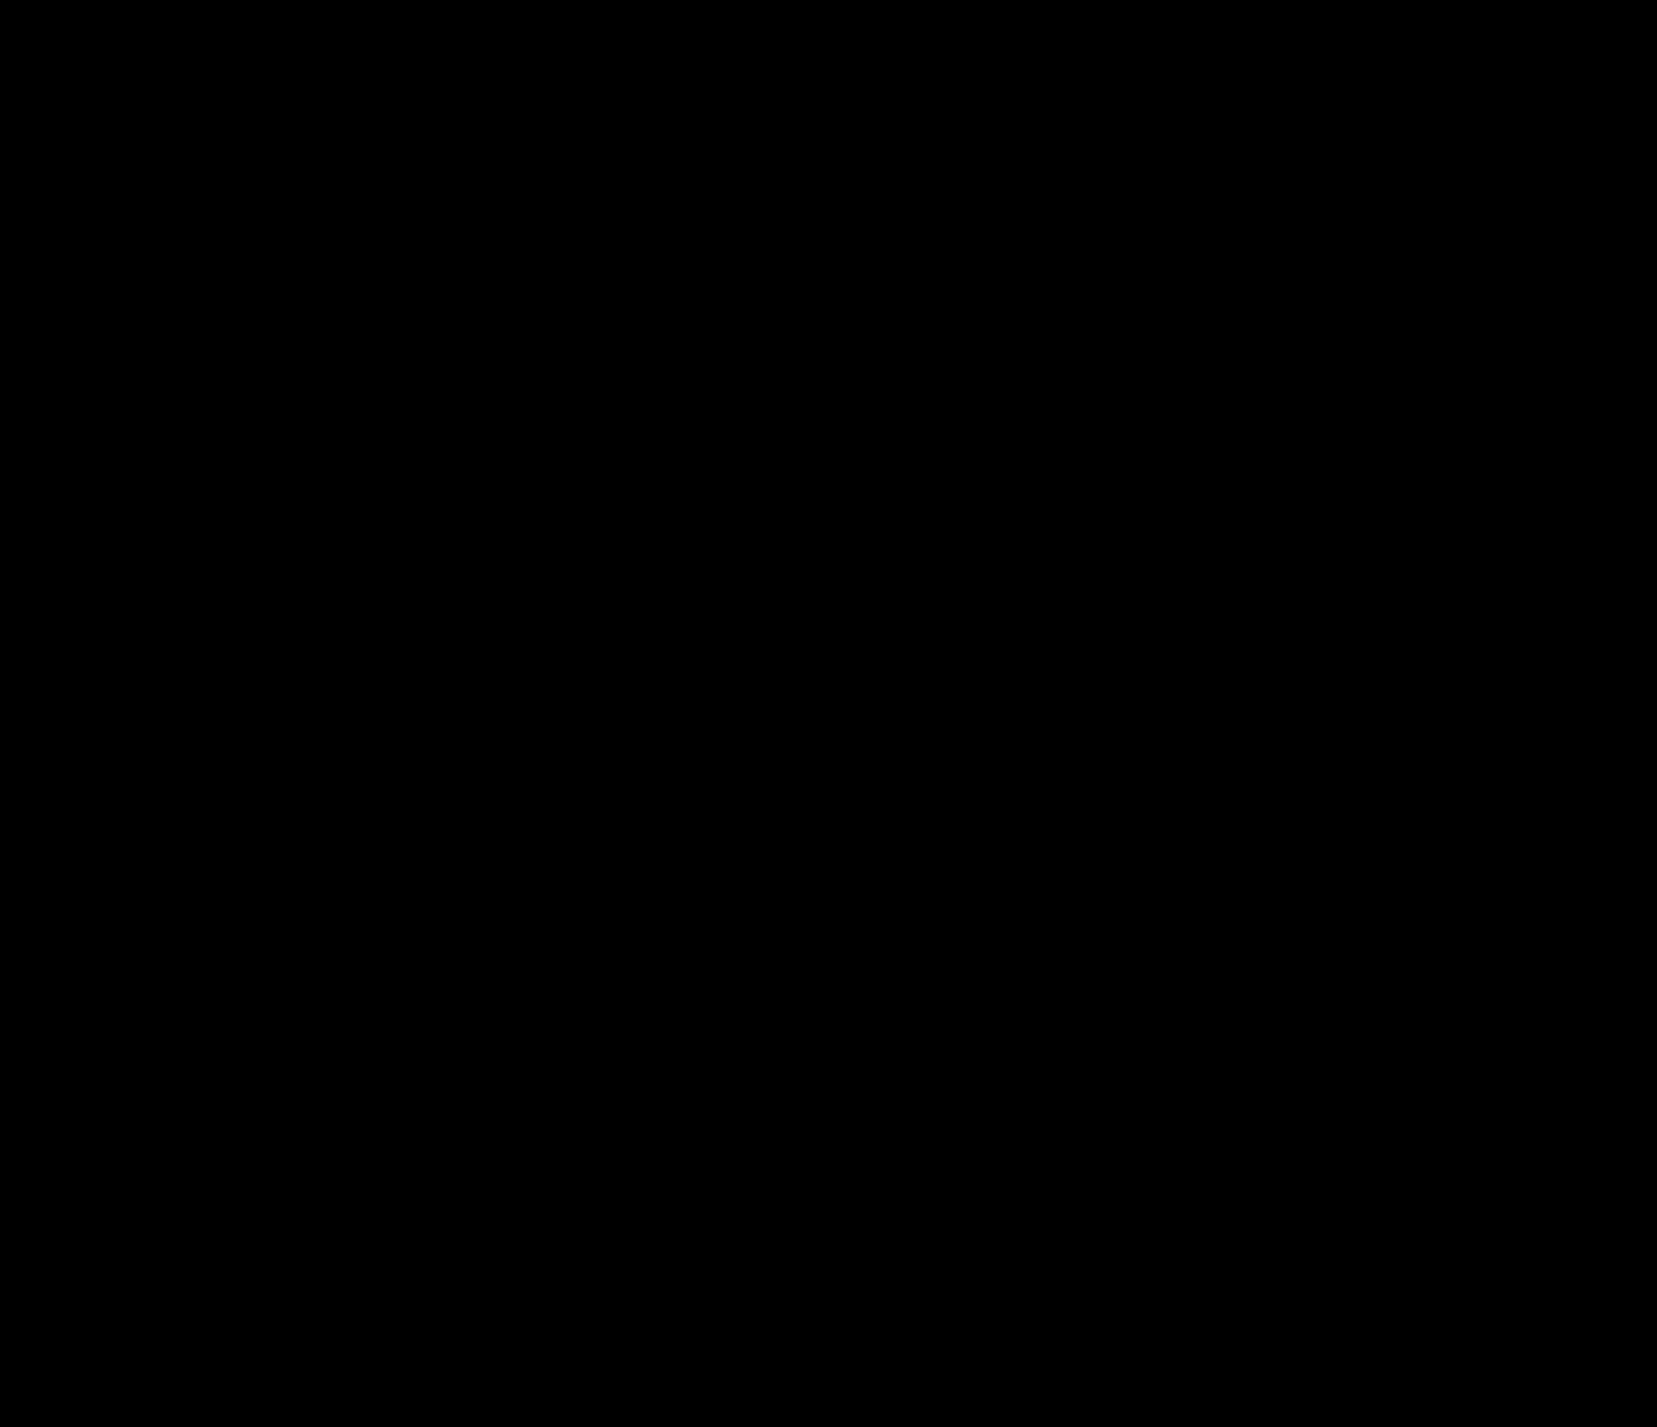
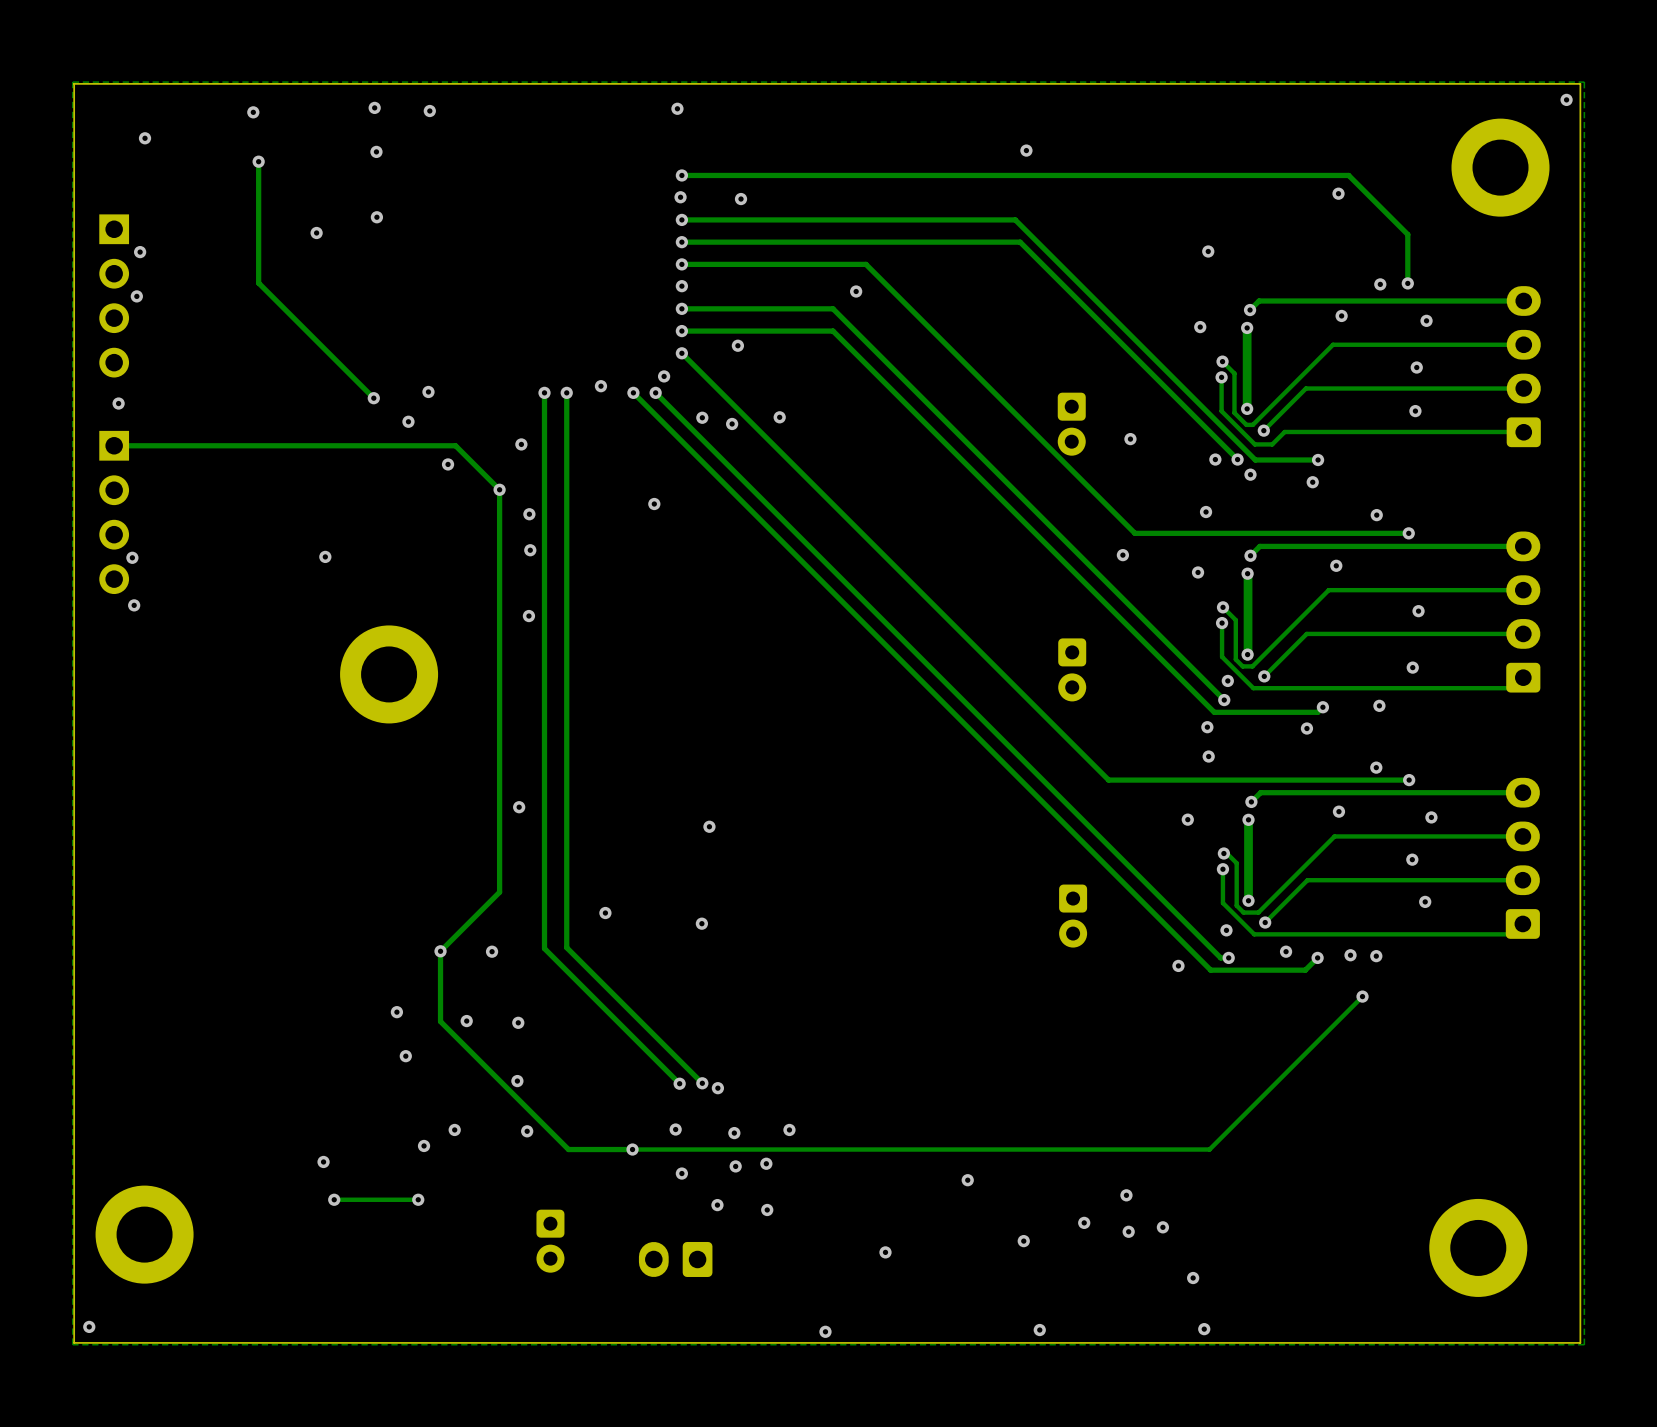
zone outline: none -> (1584, 82) (72, 82) (72, 1344) (1584, 1344) (1584, 82)
board edge: none -> (1580, 83) (74, 83) (74, 1342) (1580, 1342) (1580, 83)
via: none -> (1566, 99)
via: none -> (374, 107)
via: none -> (677, 108)
via: none -> (429, 111)
via: none -> (253, 112)
via: none -> (145, 138)
via: none -> (1026, 150)
via: none -> (376, 151)
track: none -> (258, 161) (258, 283) (373, 398)
via: none -> (258, 161)
part: none -> (1500, 167)
track: none -> (681, 175) (1348, 175) (1407, 234) (1407, 283)
via: none -> (681, 175)
via: none -> (1338, 193)
via: none -> (680, 197)
via: none -> (741, 199)
via: none -> (376, 217)
track: none -> (681, 219) (1015, 219) (1255, 459) (1318, 459)
via: none -> (681, 219)
via: none -> (316, 232)
track: none -> (681, 242) (1020, 242) (1237, 459)
via: none -> (681, 242)
via: none -> (1208, 251)
via: none -> (140, 252)
track: none -> (681, 264) (865, 264) (1134, 533) (1408, 533)
via: none -> (681, 264)
via: none -> (1407, 283)
via: none -> (1380, 284)
via: none -> (681, 286)
via: none -> (856, 291)
part: none -> (114, 295)
via: none -> (136, 296)
track: none -> (1523, 301) (1259, 301) (1250, 310)
track: none -> (681, 308) (833, 308) (1224, 700)
via: none -> (681, 308)
via: none -> (1250, 310)
via: none -> (1341, 315)
via: none -> (1426, 320)
via: none -> (1200, 327)
track: none -> (1247, 327) (1247, 408)
via: none -> (1247, 327)
track: none -> (681, 331) (833, 331) (1214, 712) (1317, 712) (1322, 707)
via: none -> (681, 331)
track: none -> (1523, 344) (1333, 344) (1252, 424) (1246, 424) (1234, 412) (1234, 373) (1222, 361)
via: none -> (737, 345)
track: none -> (681, 353) (1108, 780) (1409, 780)
via: none -> (681, 353)
via: none -> (1222, 361)
part: none -> (1523, 366)
via: none -> (1416, 367)
via: none -> (664, 376)
track: none -> (1221, 377) (1221, 411) (1254, 444) (1272, 444) (1284, 431) (1523, 432)
via: none -> (1221, 377)
via: none -> (600, 386)
track: none -> (1523, 388) (1305, 388) (1263, 430)
via: none -> (428, 391)
track: none -> (544, 392) (544, 948) (679, 1083)
via: none -> (544, 392)
track: none -> (566, 392) (566, 947) (702, 1083)
via: none -> (566, 392)
track: none -> (633, 392) (1210, 970) (1305, 970) (1317, 957)
via: none -> (633, 392)
track: none -> (655, 392) (1220, 957) (1228, 957)
via: none -> (655, 392)
via: none -> (373, 398)
via: none -> (118, 403)
via: none -> (1247, 408)
via: none -> (1415, 411)
via: none -> (702, 417)
via: none -> (779, 417)
via: none -> (408, 421)
via: none -> (732, 423)
part: none -> (1071, 424)
via: none -> (1263, 430)
via: none -> (1130, 439)
via: none -> (521, 444)
track: none -> (114, 445) (455, 445) (499, 489) (499, 892) (440, 951) (440, 1021) (568, 1149) (1209, 1149) (1362, 996)
via: none -> (1215, 459)
via: none -> (1237, 459)
via: none -> (1318, 459)
via: none -> (448, 464)
via: none -> (1250, 474)
via: none -> (1312, 482)
via: none -> (499, 489)
via: none -> (654, 504)
part: none -> (114, 512)
via: none -> (1206, 512)
via: none -> (529, 514)
via: none -> (1376, 515)
via: none -> (1408, 533)
track: none -> (1523, 546) (1259, 546) (1250, 555)
via: none -> (530, 550)
via: none -> (1122, 555)
via: none -> (1250, 555)
via: none -> (325, 556)
via: none -> (132, 557)
via: none -> (1336, 565)
via: none -> (1198, 572)
via: none -> (1247, 573)
track: none -> (1248, 573) (1248, 654)
track: none -> (1523, 590) (1328, 590) (1252, 666) (1242, 666) (1235, 659) (1235, 620) (1223, 607)
via: none -> (134, 605)
via: none -> (1223, 607)
via: none -> (1418, 611)
part: none -> (1523, 612)
via: none -> (528, 616)
track: none -> (1222, 623) (1222, 656) (1253, 688) (1512, 688) (1523, 677)
via: none -> (1222, 623)
track: none -> (1523, 633) (1306, 633) (1264, 676)
via: none -> (1247, 654)
via: none -> (1412, 667)
part: none -> (1072, 669)
part: none -> (389, 674)
via: none -> (1264, 676)
via: none -> (1227, 680)
via: none -> (1224, 700)
via: none -> (1379, 705)
via: none -> (1322, 707)
via: none -> (1207, 727)
via: none -> (1306, 728)
via: none -> (1208, 756)
via: none -> (1376, 767)
via: none -> (1409, 780)
track: none -> (1522, 792) (1260, 792) (1251, 801)
via: none -> (1251, 801)
via: none -> (519, 807)
via: none -> (1338, 811)
via: none -> (1431, 817)
via: none -> (1187, 819)
track: none -> (1248, 819) (1248, 900)
via: none -> (1248, 819)
via: none -> (709, 826)
track: none -> (1522, 836) (1334, 836) (1258, 912) (1243, 912) (1236, 905) (1236, 863) (1226, 853) (1223, 853)
via: none -> (1223, 853)
part: none -> (1522, 858)
via: none -> (1412, 859)
track: none -> (1222, 869) (1222, 903) (1254, 934) (1512, 934) (1522, 923)
via: none -> (1222, 869)
track: none -> (1522, 880) (1307, 880) (1265, 922)
via: none -> (1248, 900)
via: none -> (1425, 901)
via: none -> (605, 913)
part: none -> (1073, 916)
via: none -> (1265, 922)
via: none -> (701, 923)
via: none -> (1226, 930)
via: none -> (440, 951)
via: none -> (492, 951)
via: none -> (1286, 951)
via: none -> (1350, 955)
via: none -> (1376, 956)
via: none -> (1228, 957)
via: none -> (1317, 957)
via: none -> (1178, 965)
via: none -> (1362, 996)
via: none -> (396, 1012)
via: none -> (466, 1021)
via: none -> (518, 1022)
via: none -> (405, 1056)
via: none -> (517, 1081)
via: none -> (679, 1083)
via: none -> (702, 1083)
via: none -> (717, 1088)
via: none -> (454, 1129)
via: none -> (675, 1129)
via: none -> (789, 1129)
via: none -> (527, 1131)
via: none -> (734, 1133)
via: none -> (424, 1145)
via: none -> (632, 1149)
via: none -> (323, 1161)
via: none -> (766, 1163)
via: none -> (735, 1166)
via: none -> (681, 1173)
via: none -> (967, 1180)
via: none -> (1126, 1195)
via: none -> (334, 1199)
track: none -> (418, 1199) (334, 1199)
via: none -> (418, 1199)
via: none -> (717, 1205)
via: none -> (767, 1209)
via: none -> (1084, 1222)
via: none -> (1162, 1227)
via: none -> (1128, 1231)
part: none -> (144, 1234)
part: none -> (550, 1241)
via: none -> (1023, 1241)
part: none -> (1478, 1247)
via: none -> (885, 1252)
part: none -> (675, 1259)
via: none -> (1193, 1278)
via: none -> (89, 1326)
via: none -> (1204, 1329)
via: none -> (1039, 1330)
via: none -> (825, 1331)

